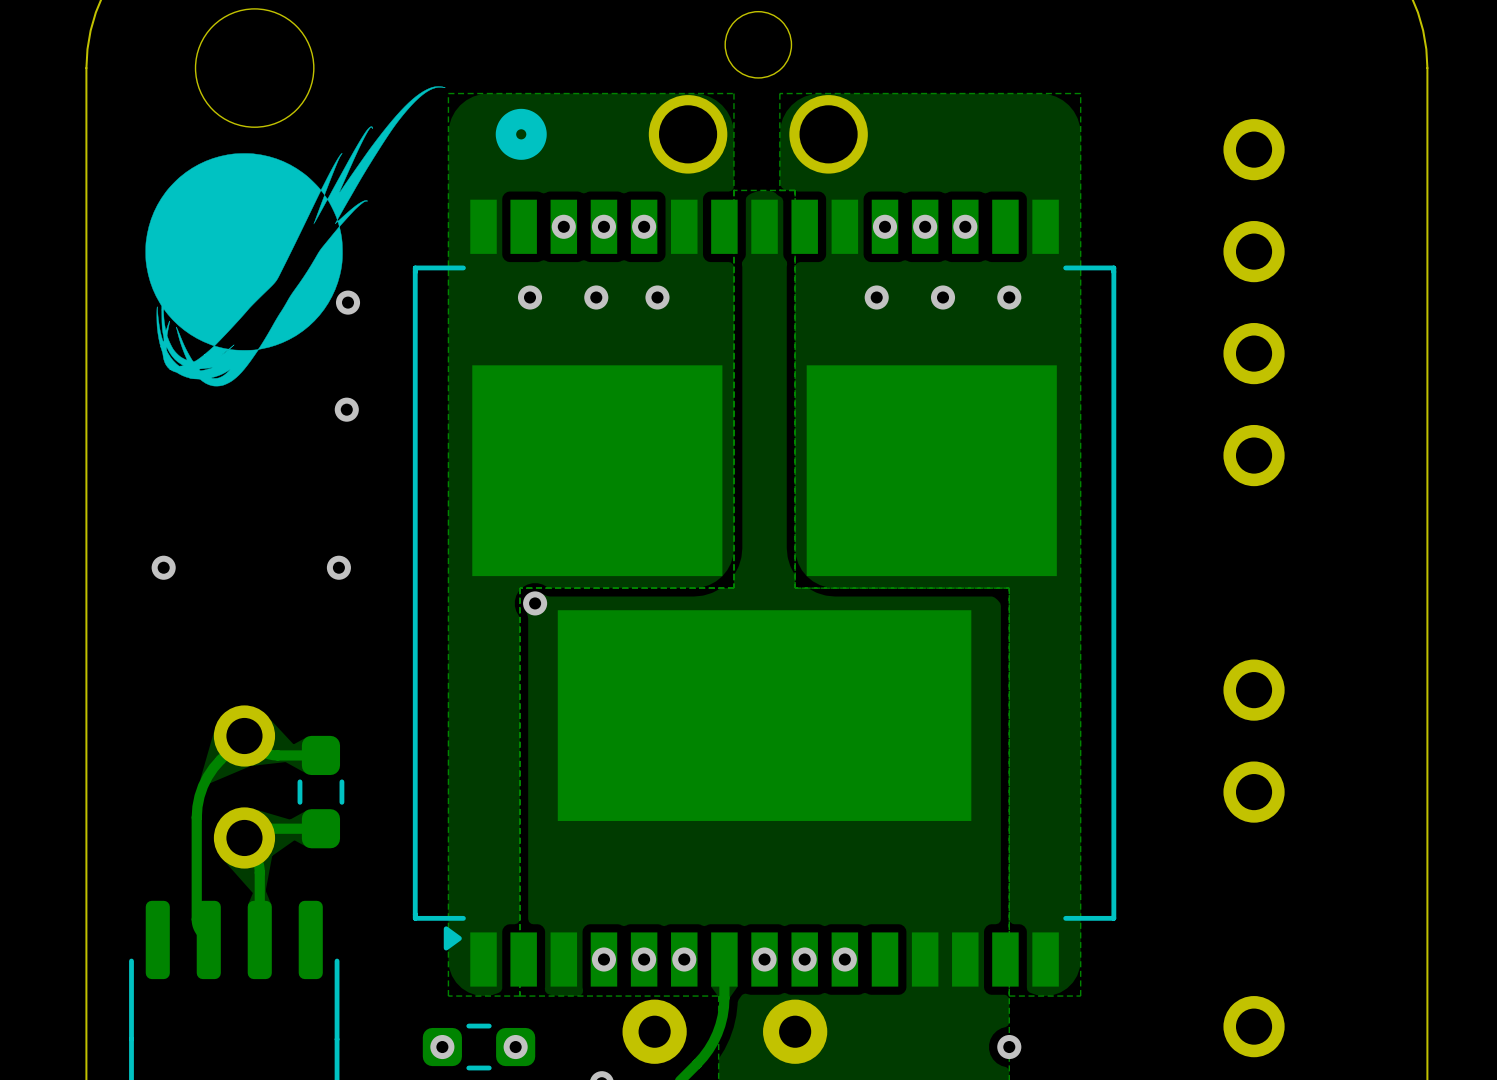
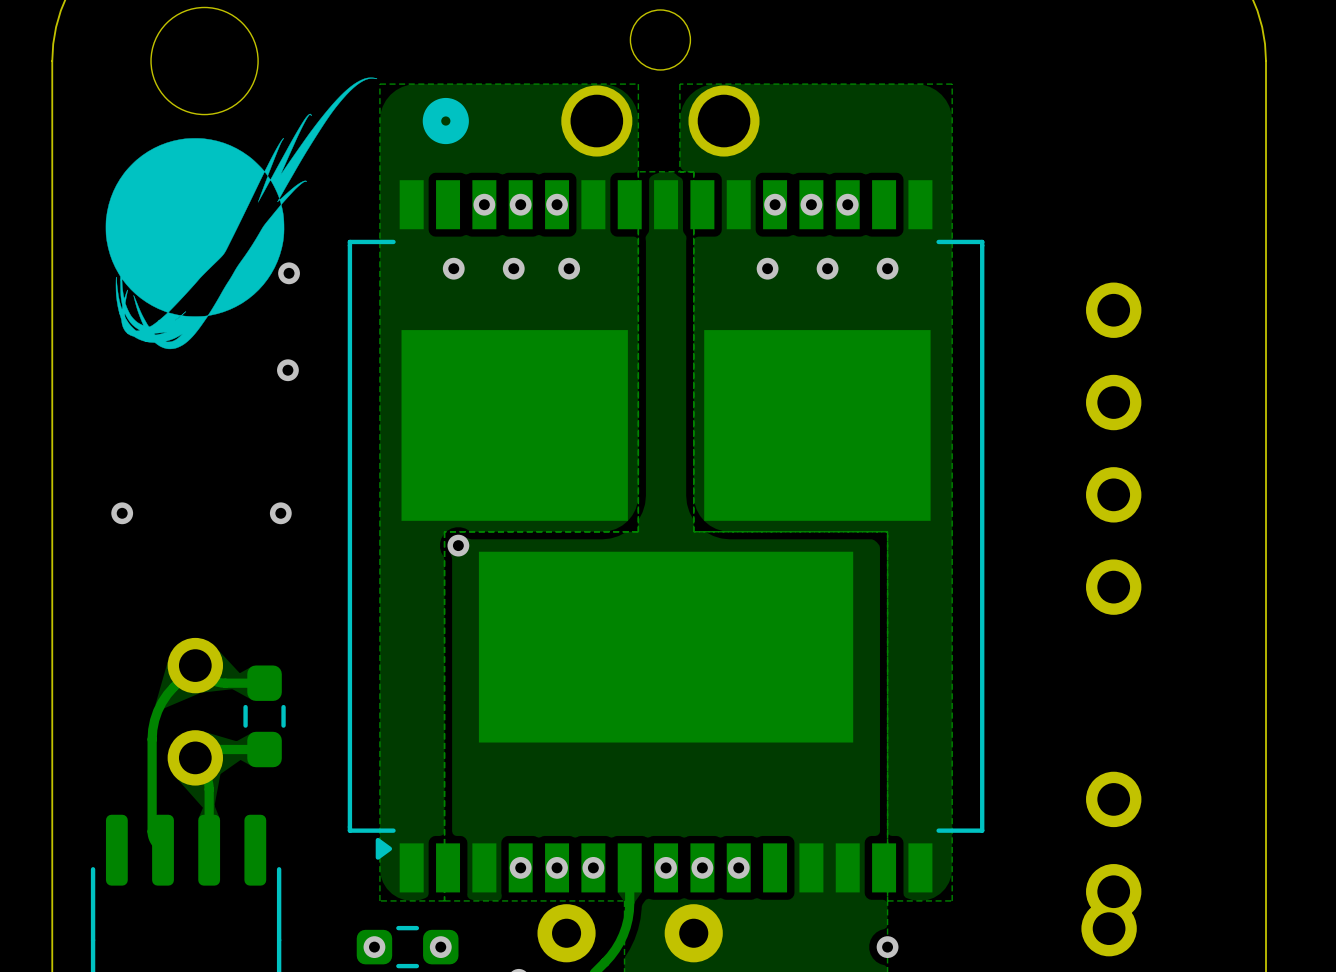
part position: (1254, 302) -> (1113, 448)
part position: (1254, 741) -> (1113, 845)

